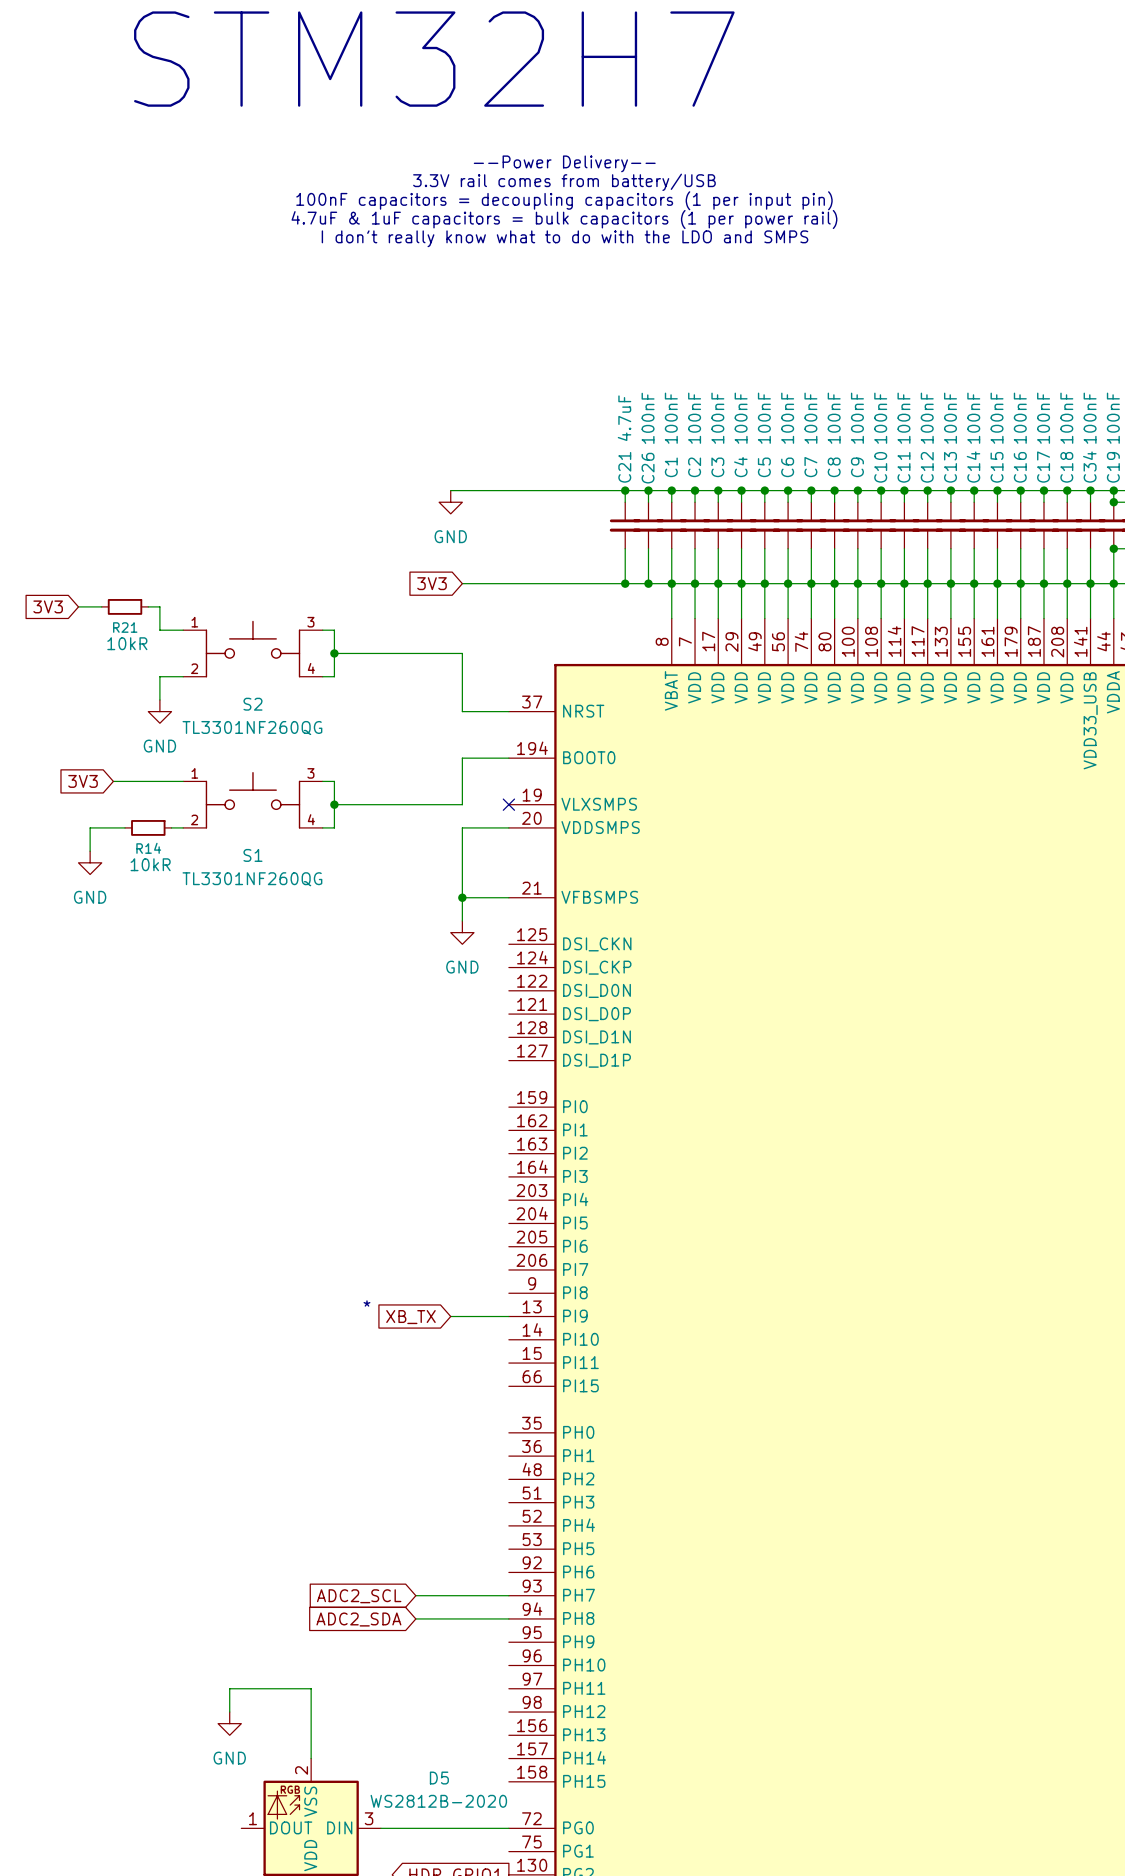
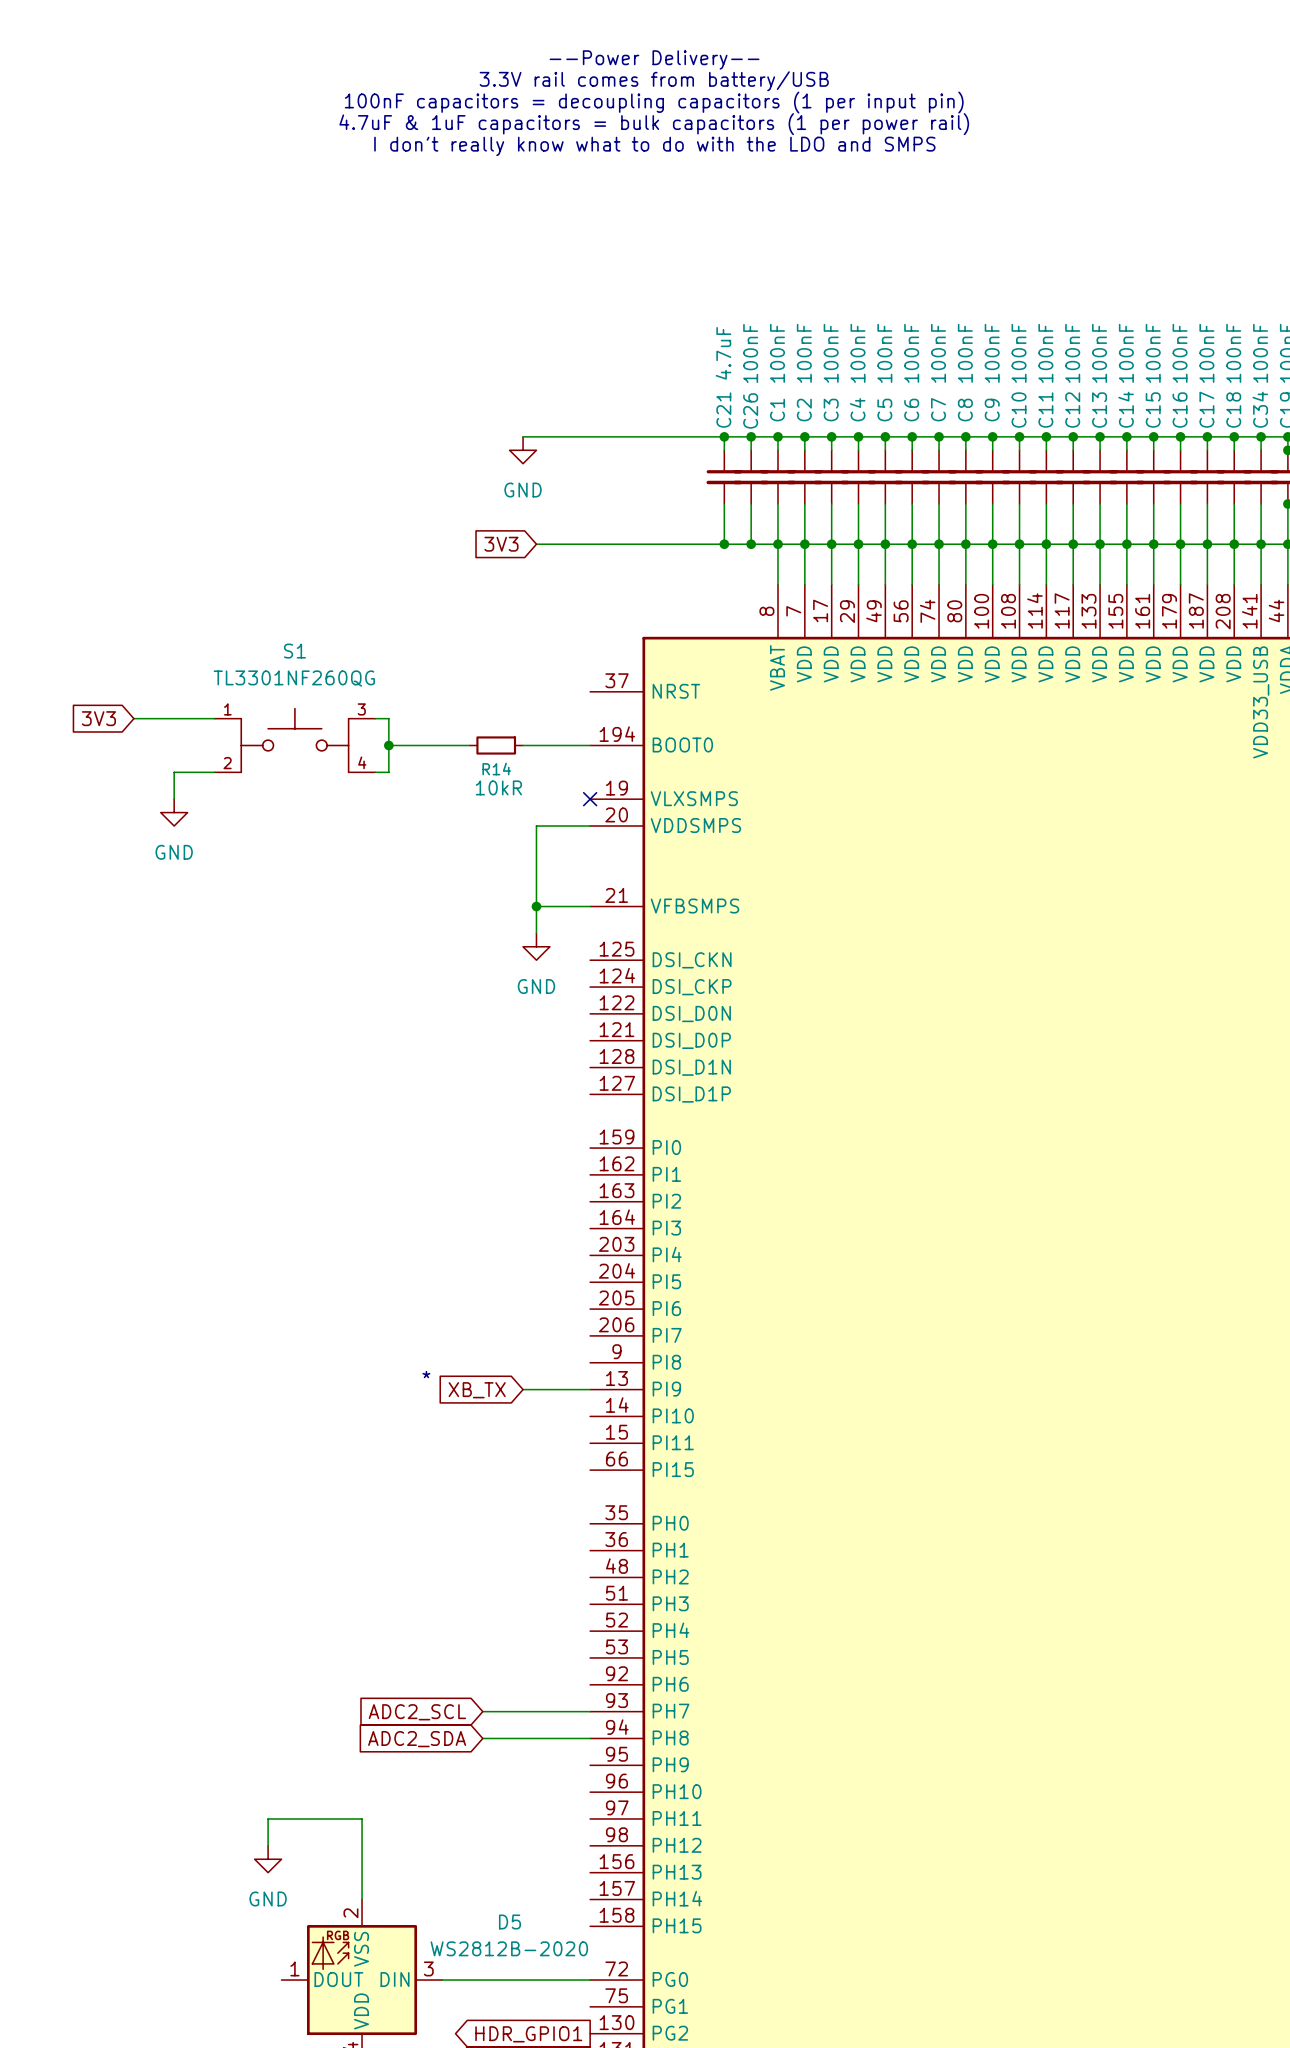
global label: 3V3 (48, 606) -> none
wire: (78, 606) (101, 606) -> none
R21: 10kR (125, 606) -> none
wire: (148, 606) (159, 606) (159, 630) (183, 630) -> none
wire: (322, 630) (334, 630) (334, 676) (322, 676) -> none
S2: TL3301NF260QG (252, 649) -> none
wire: (334, 653) (462, 653) (462, 711) (508, 711) -> none
junction: (334, 653) -> none
wire: (183, 676) (159, 676) (159, 699) -> none
power symbol: GND (159, 711) -> none
wire: none -> (133, 718) (214, 718)
wire: none -> (388, 745) (469, 745)
wire: (462, 758) (462, 804) (334, 804) -> (536, 745) (523, 745)
global label position: 3V3 (83, 781) -> 3V3 (98, 718)
wire: (113, 781) (148, 781) -> (174, 799) (174, 772)
wire: (334, 781) (334, 827) (322, 827) -> (388, 772) (388, 718) (375, 718)
S1 position: (252, 800) -> (294, 740)
junction position: (334, 804) -> (388, 745)
power symbol: none -> GND (174, 812)
wire: (125, 827) (90, 827) (90, 851) -> none
R14 position: (148, 827) -> (496, 745)
wire: (171, 827) (183, 827) -> none
S1 name position: S1 (252, 855) -> S1 (294, 651)
power symbol: GND (90, 862) -> none
S1 value position: TL3301NF260QG (252, 879) -> TL3301NF260QG (294, 678)

